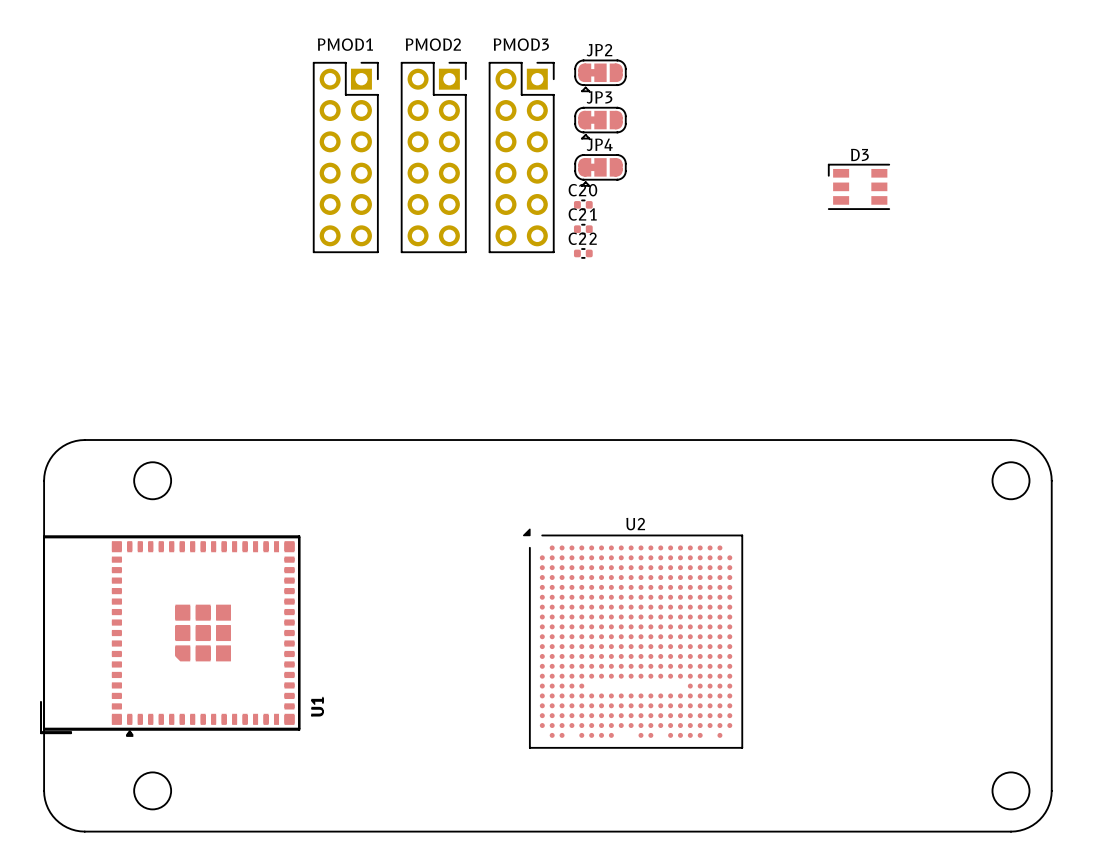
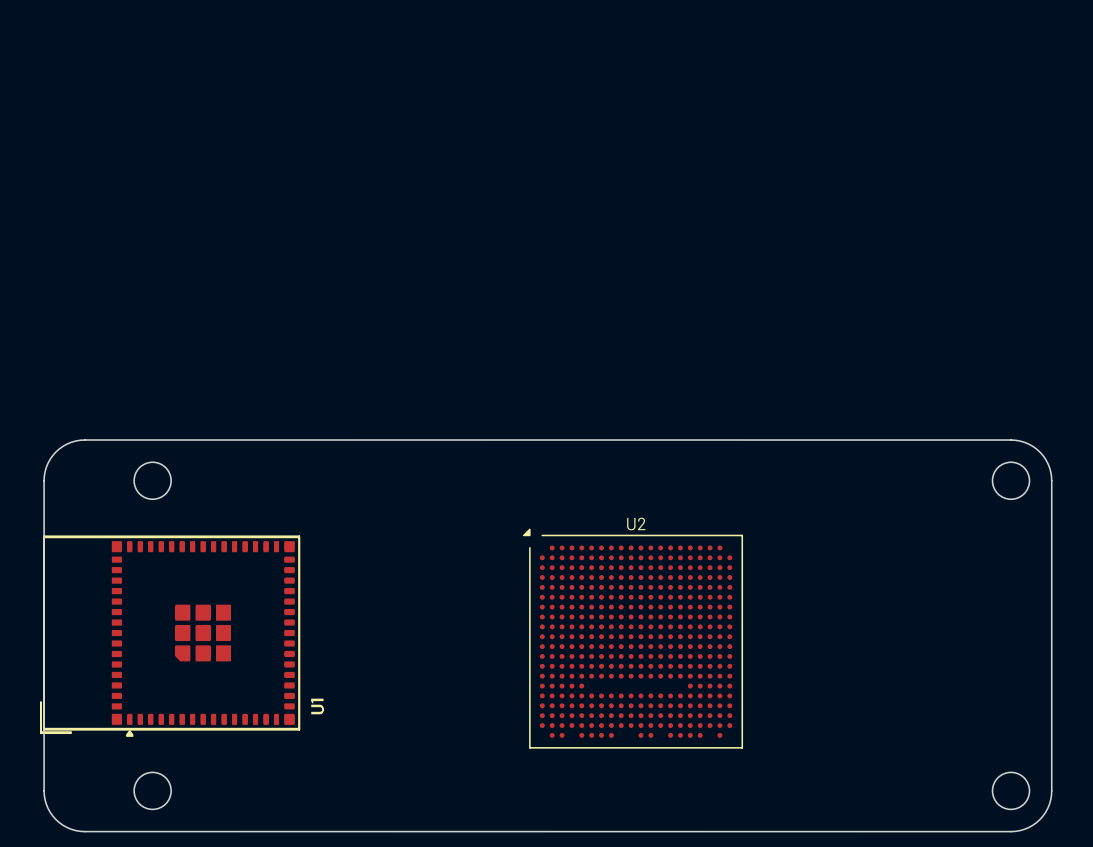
JP2: (600, 75) -> none
JP3: (600, 123) -> none
PMOD1: (345, 157) -> none
PMOD2: (433, 157) -> none
PMOD3: (521, 157) -> none
JP4: (600, 170) -> none
D3: (858, 186) -> none
C20: (583, 204) -> none
C21: (583, 229) -> none
C22: (583, 253) -> none

